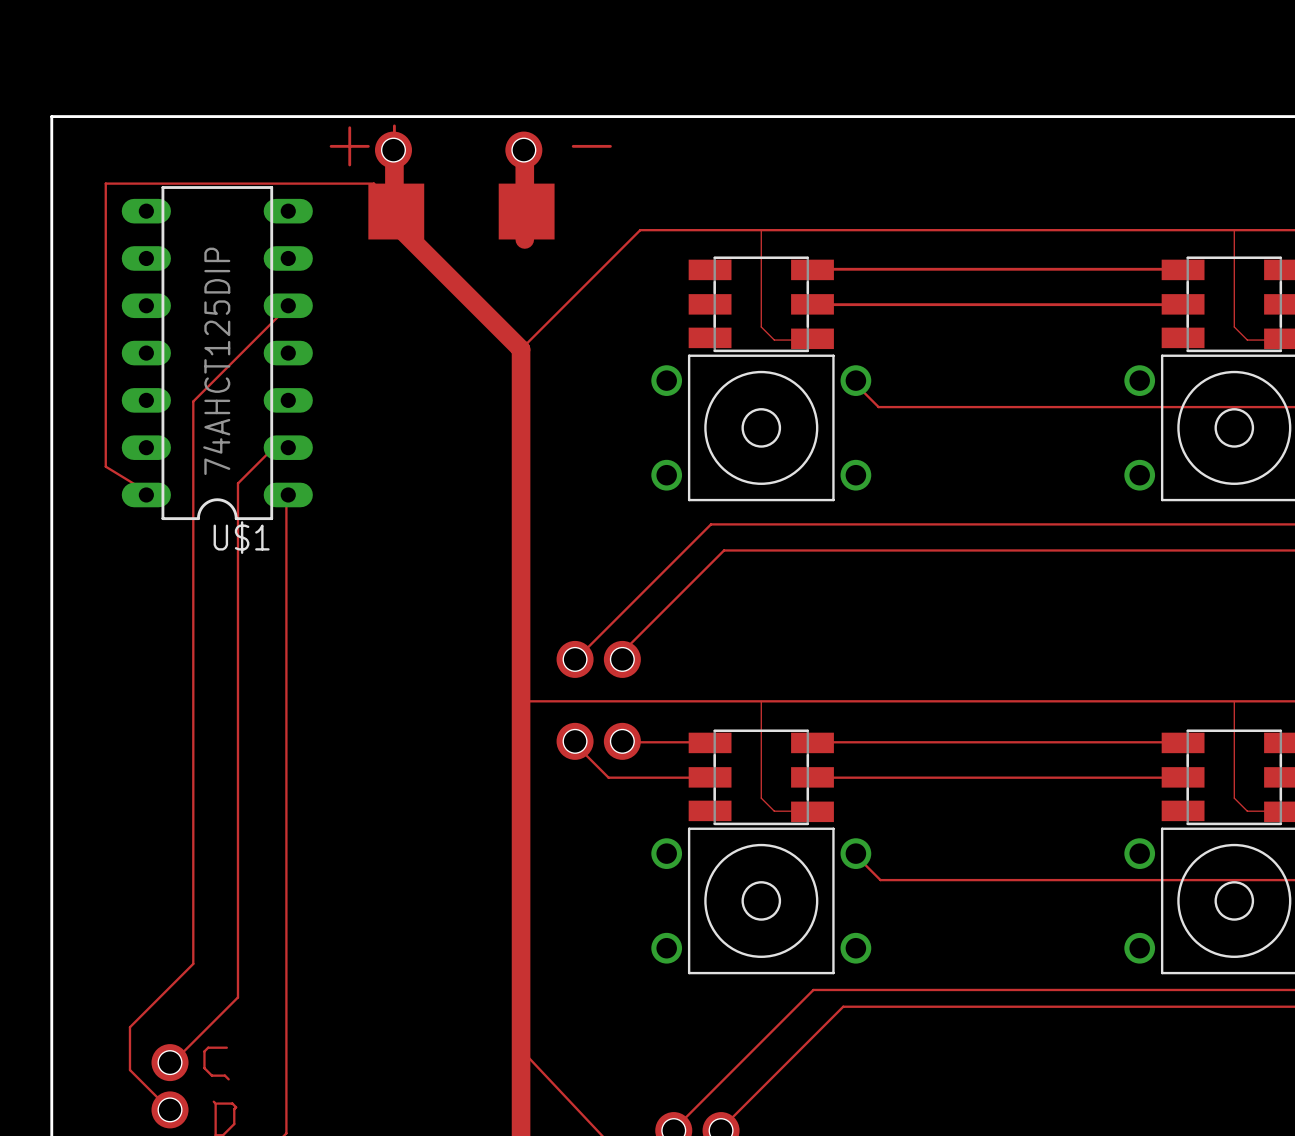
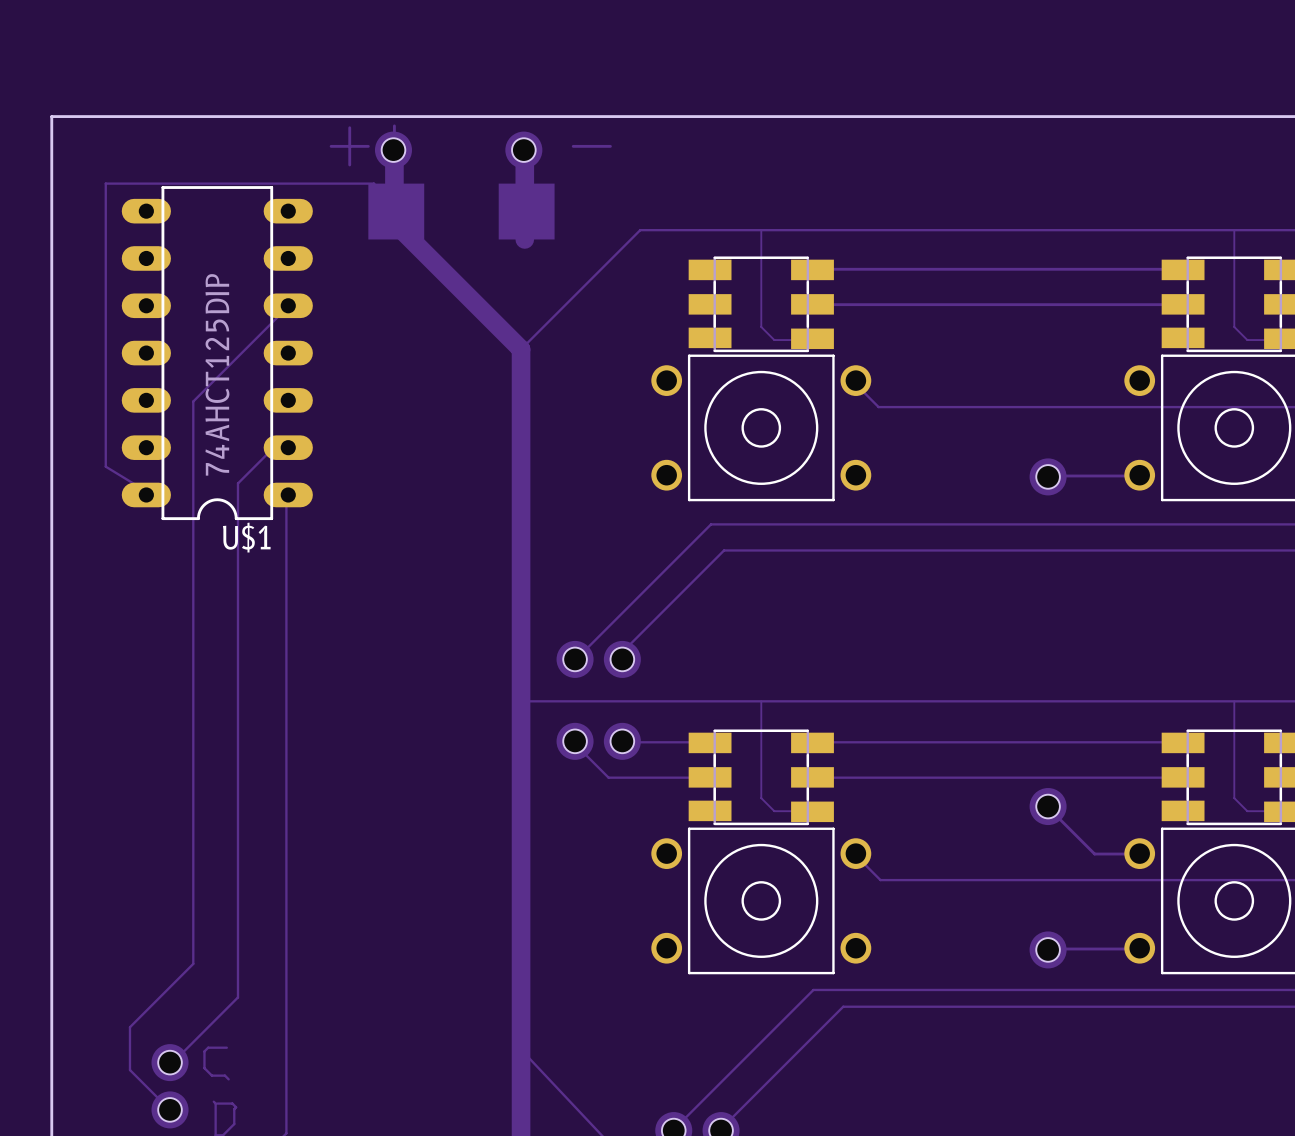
drawing: none -> [1029, 458, 1067, 496]
track: none -> (1048, 475) (1139, 475)
hole: none -> (1048, 476)
drawing: none -> [1029, 788, 1067, 826]
hole: none -> (1048, 806)
track: none -> (1048, 807) (1094, 854) (1139, 854)
drawing: none -> [1029, 931, 1067, 969]
track: none -> (1048, 949) (1139, 949)
hole: none -> (1048, 949)

